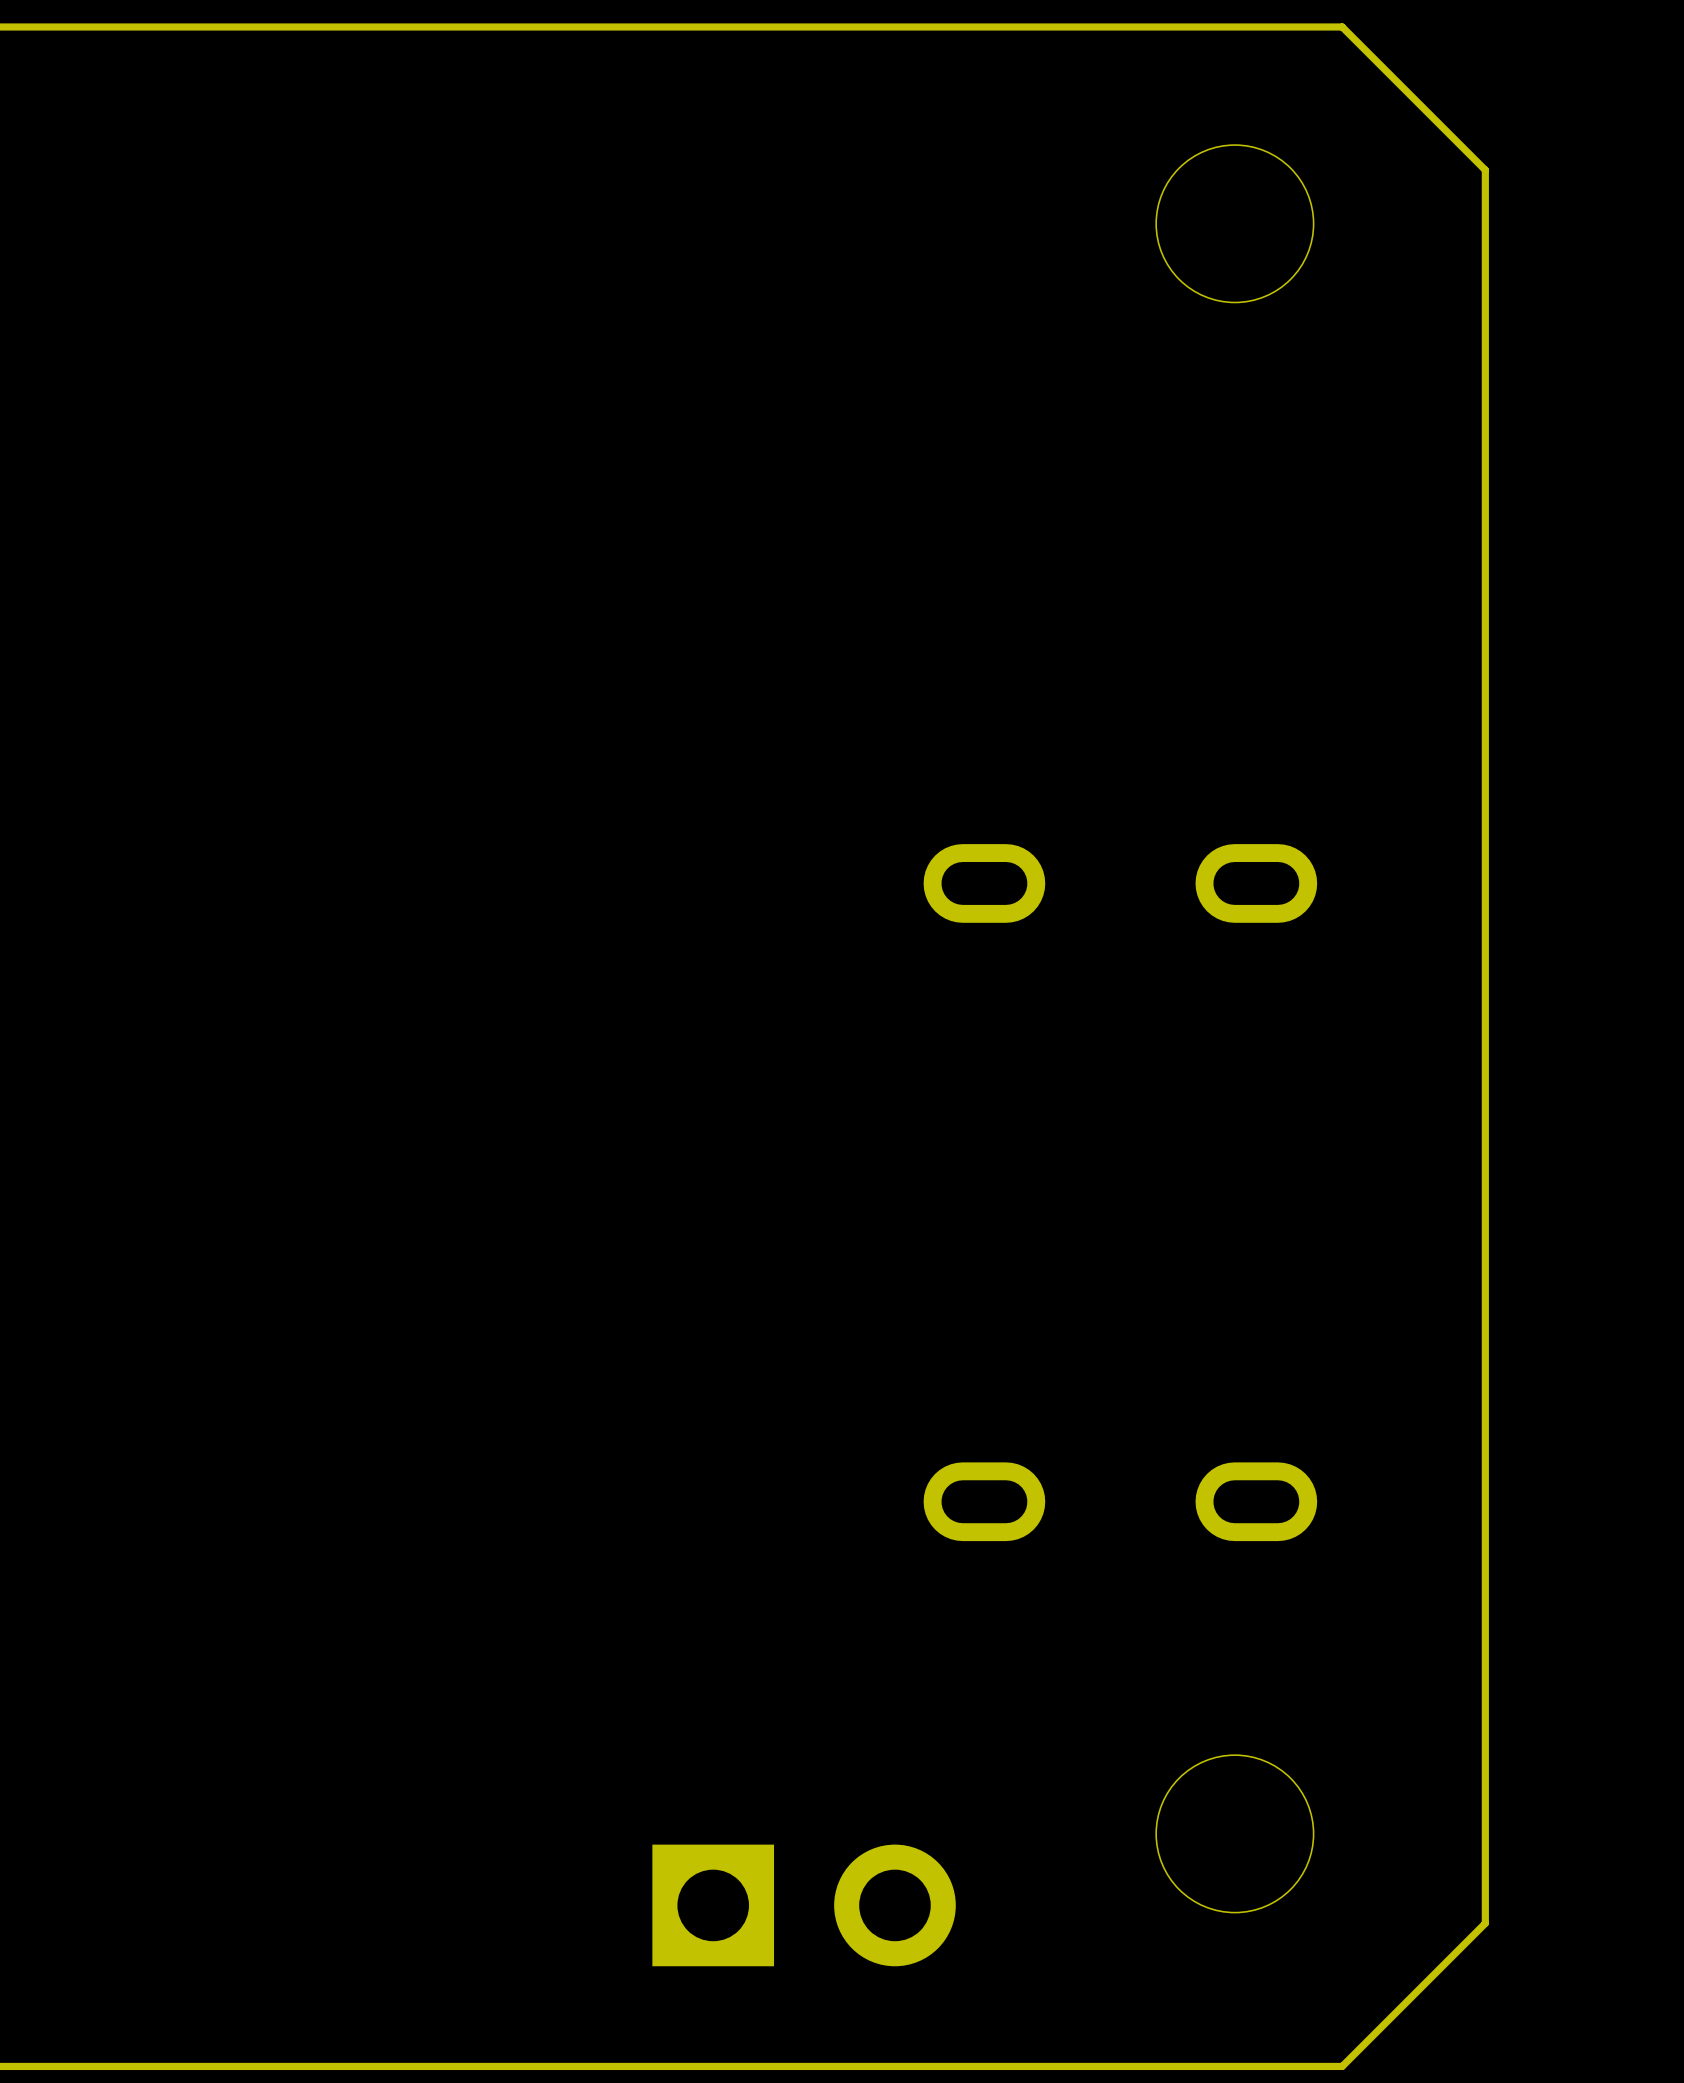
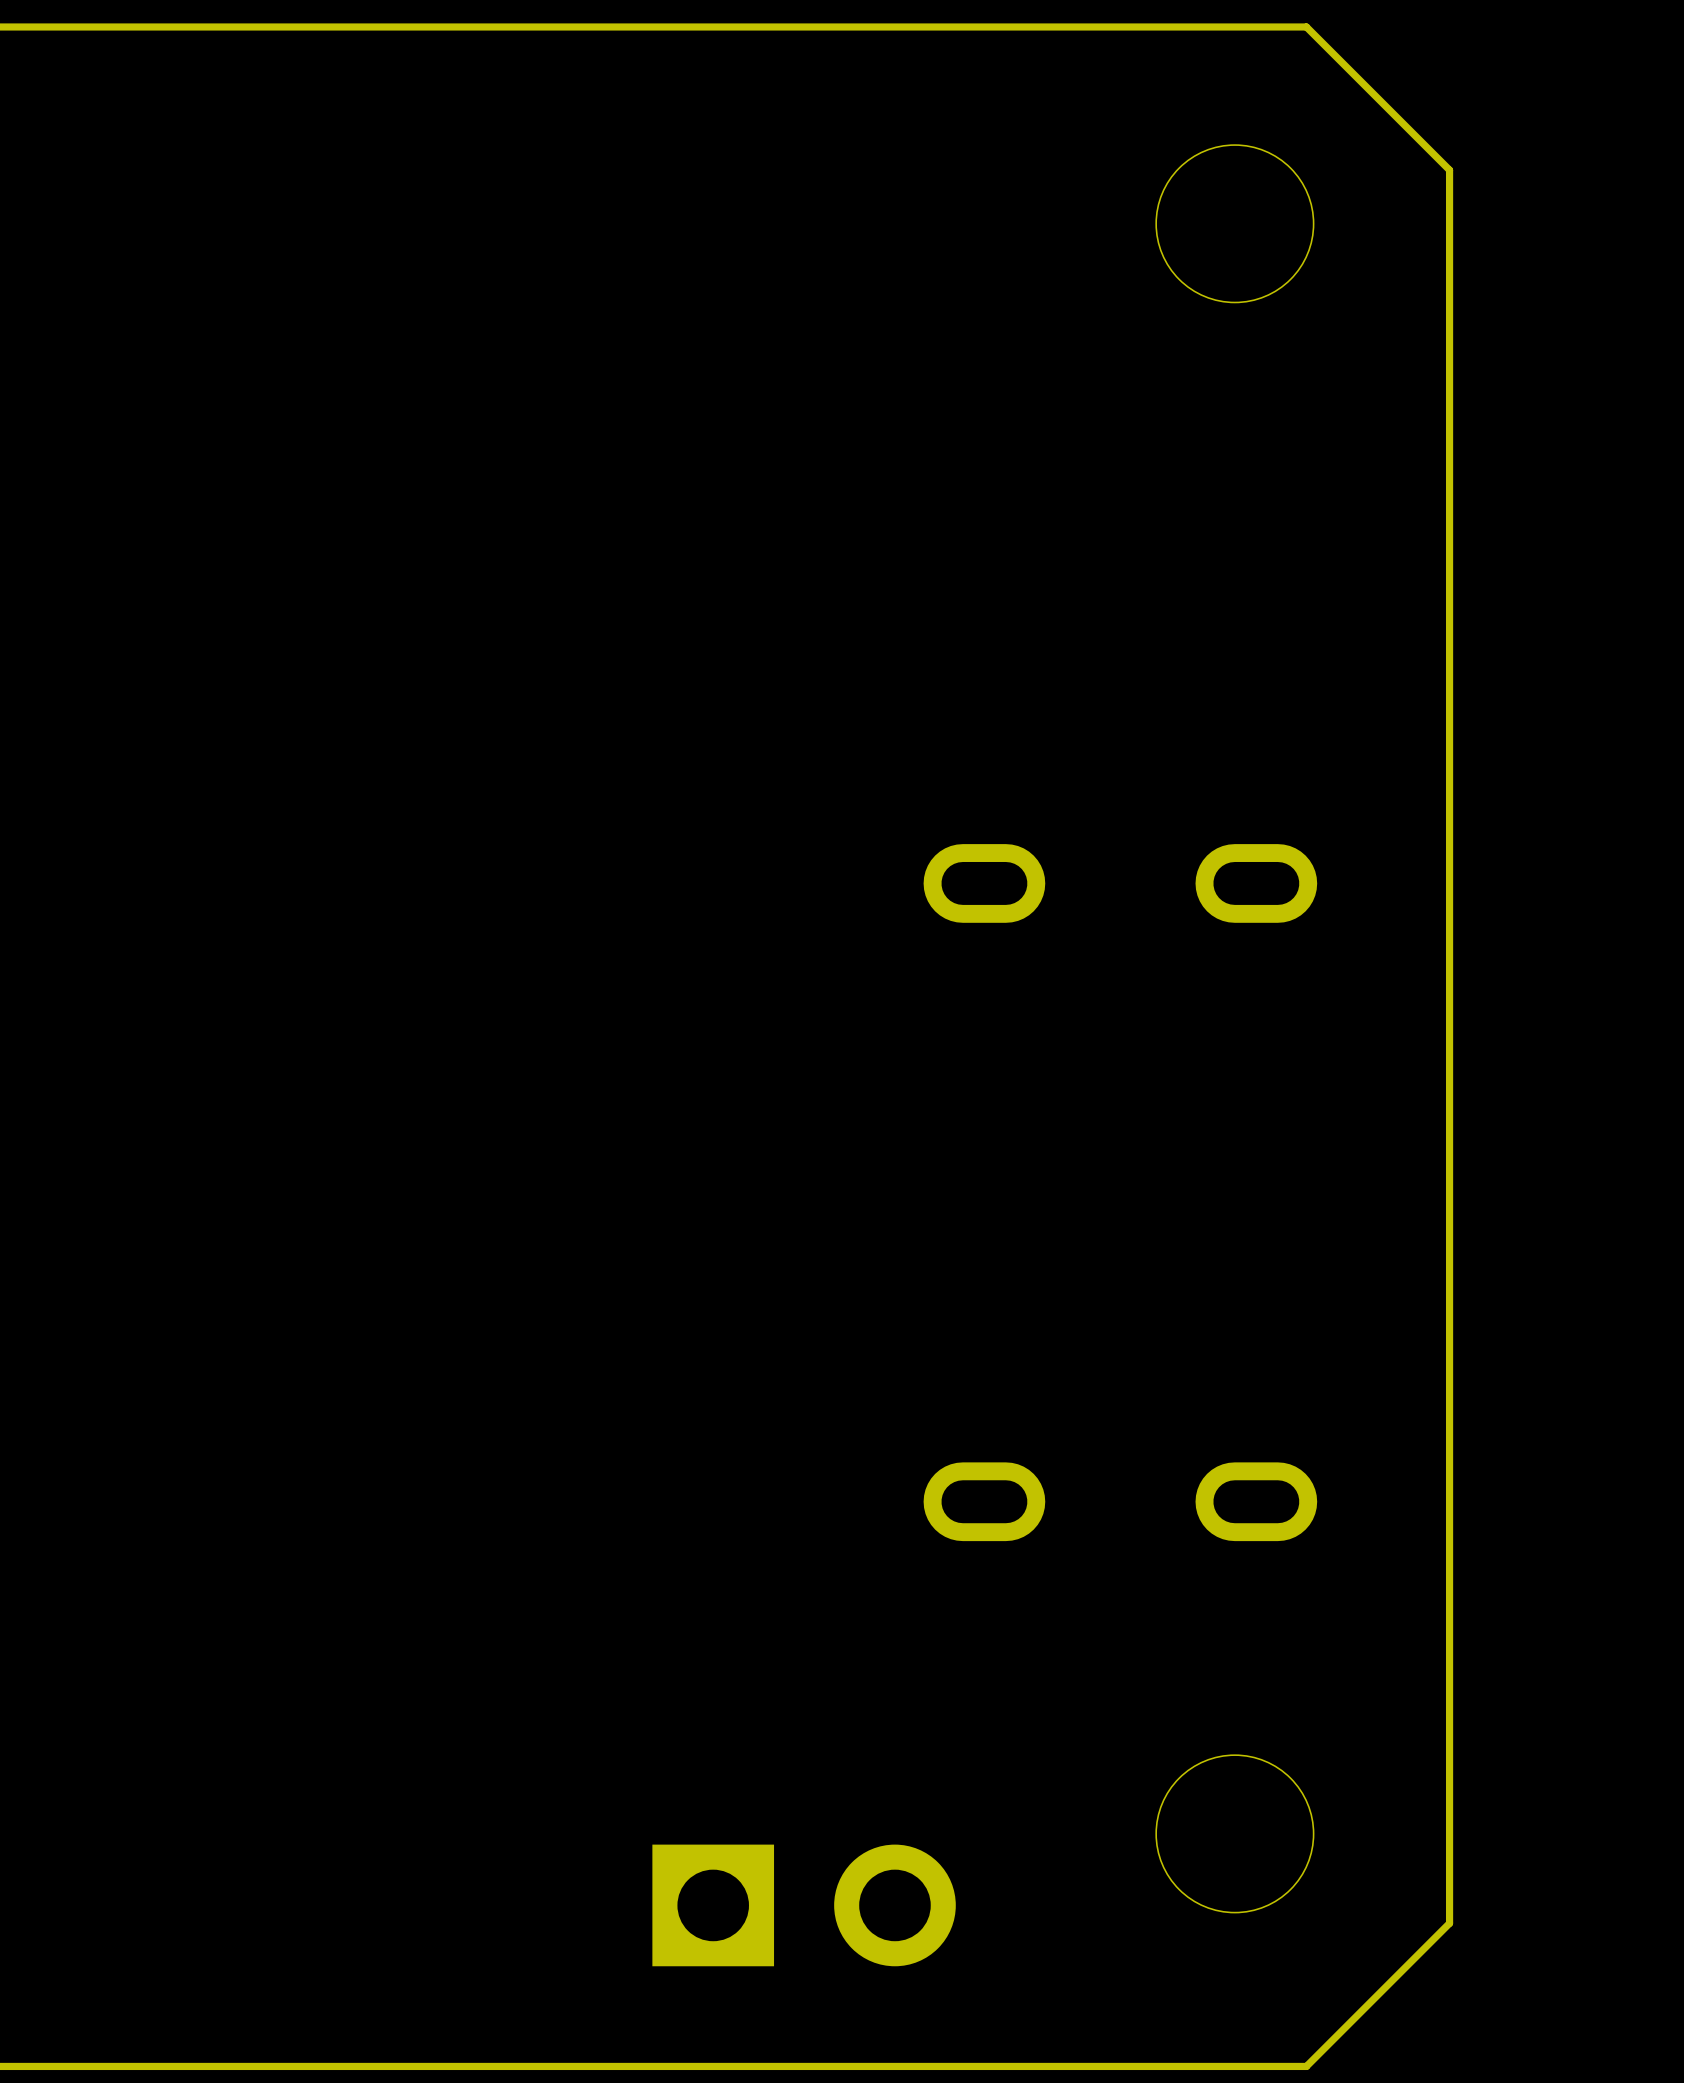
board edge: (1306, 26) (1342, 26) (1485, 170) (1485, 1923) (1342, 2066) (1306, 2066) -> (1306, 26) (1449, 170) (1449, 1923) (1306, 2066)

